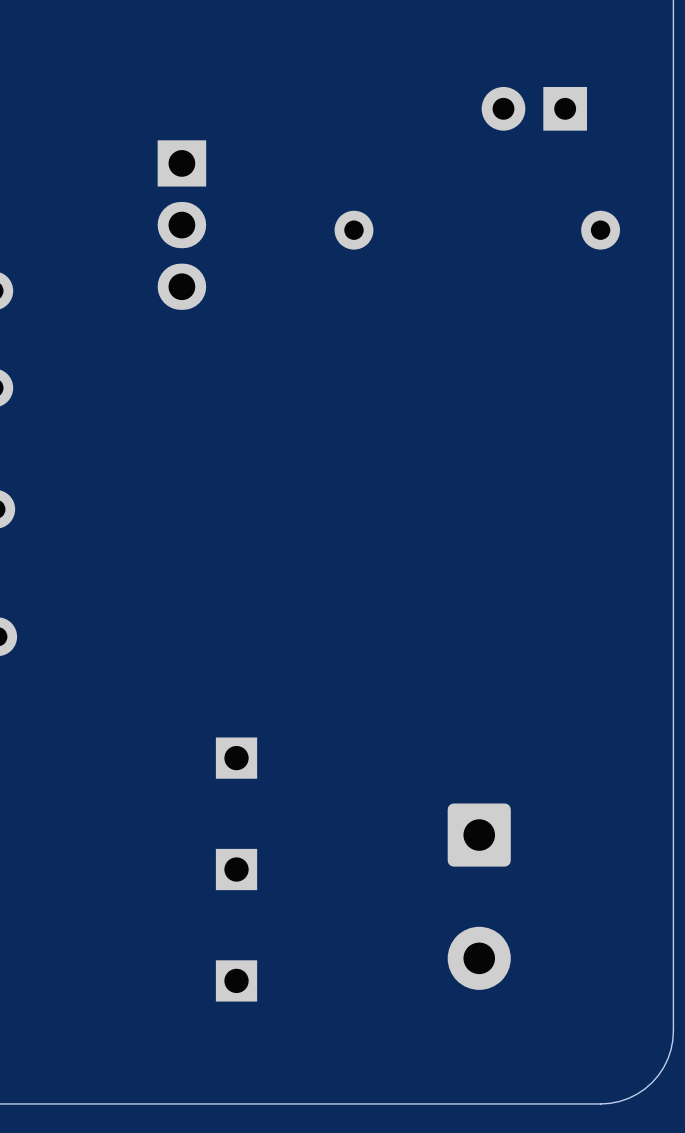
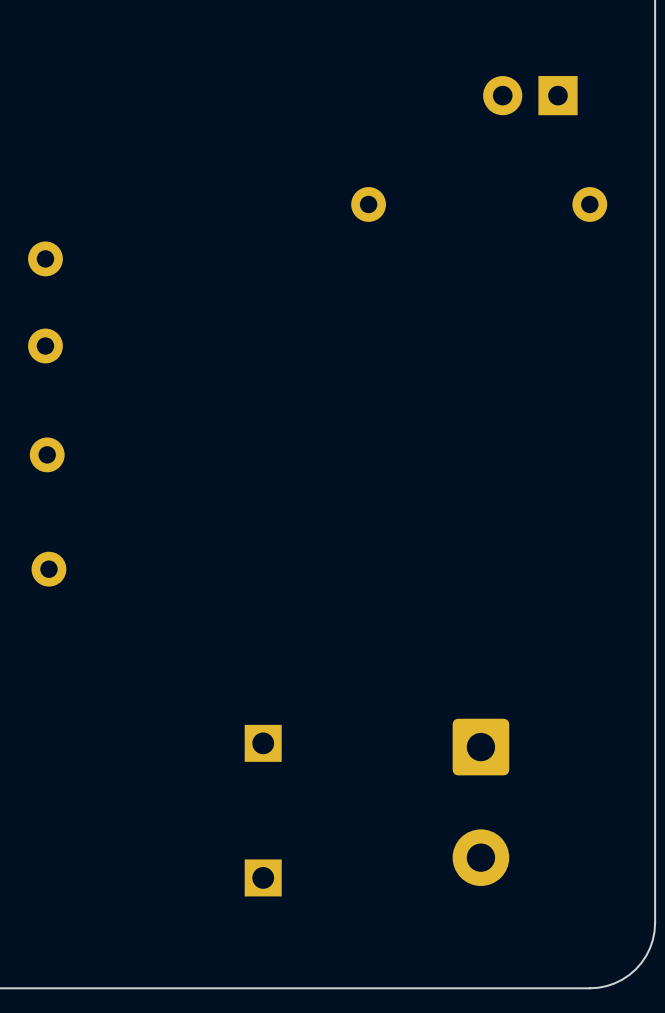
part: (181, 225) -> none
part: (236, 758) -> none
part: none -> (263, 743)
part: (236, 869) -> none

